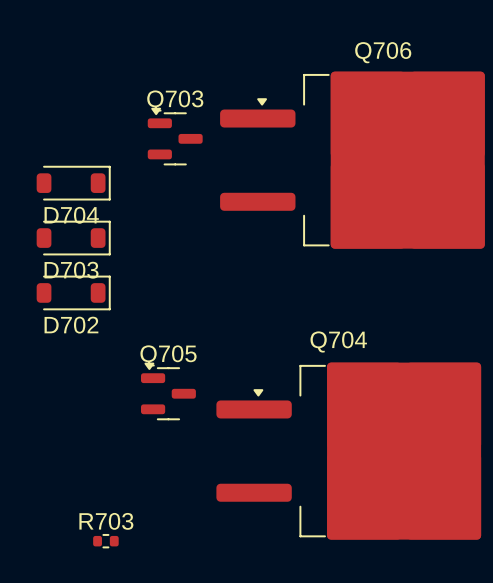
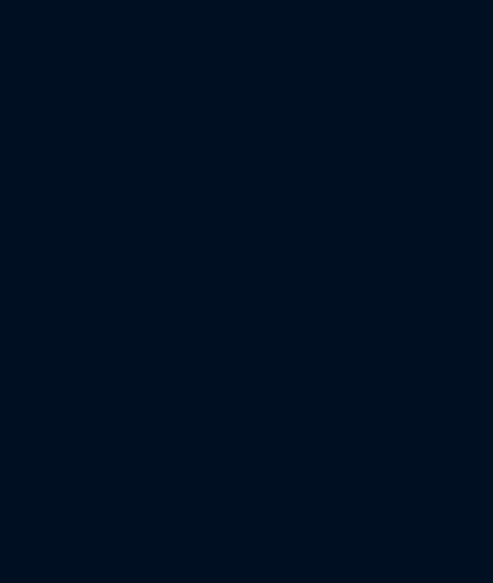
Q703: (175, 136) -> none
Q706: (352, 160) -> none
D704: (73, 183) -> none
D703: (73, 238) -> none
D702: (73, 292) -> none
Q705: (168, 391) -> none
Q704: (348, 451) -> none
R703: (105, 541) -> none

